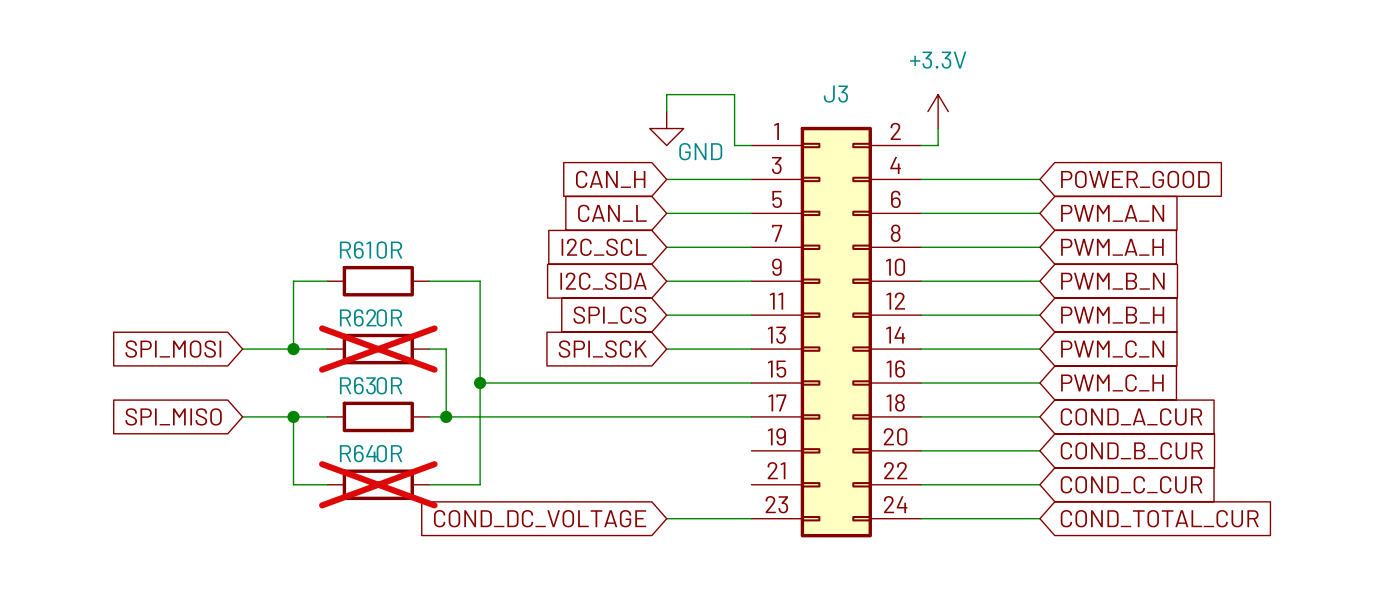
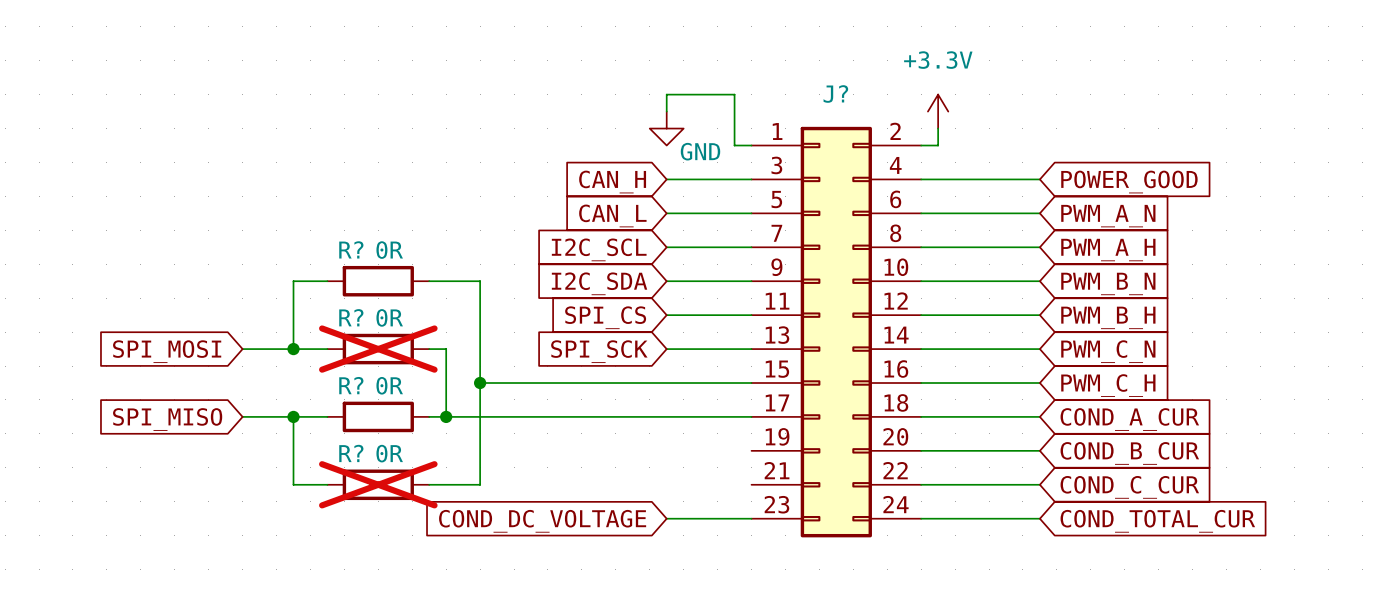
J3 name: J3 (835, 94) -> J? (835, 94)
R61 name: R61 (355, 250) -> R? (351, 249)
R62 name: R62 (358, 317) -> R? (351, 317)
R63 name: R63 (357, 385) -> R? (351, 385)
R64 name: R64 (358, 453) -> R? (351, 453)

